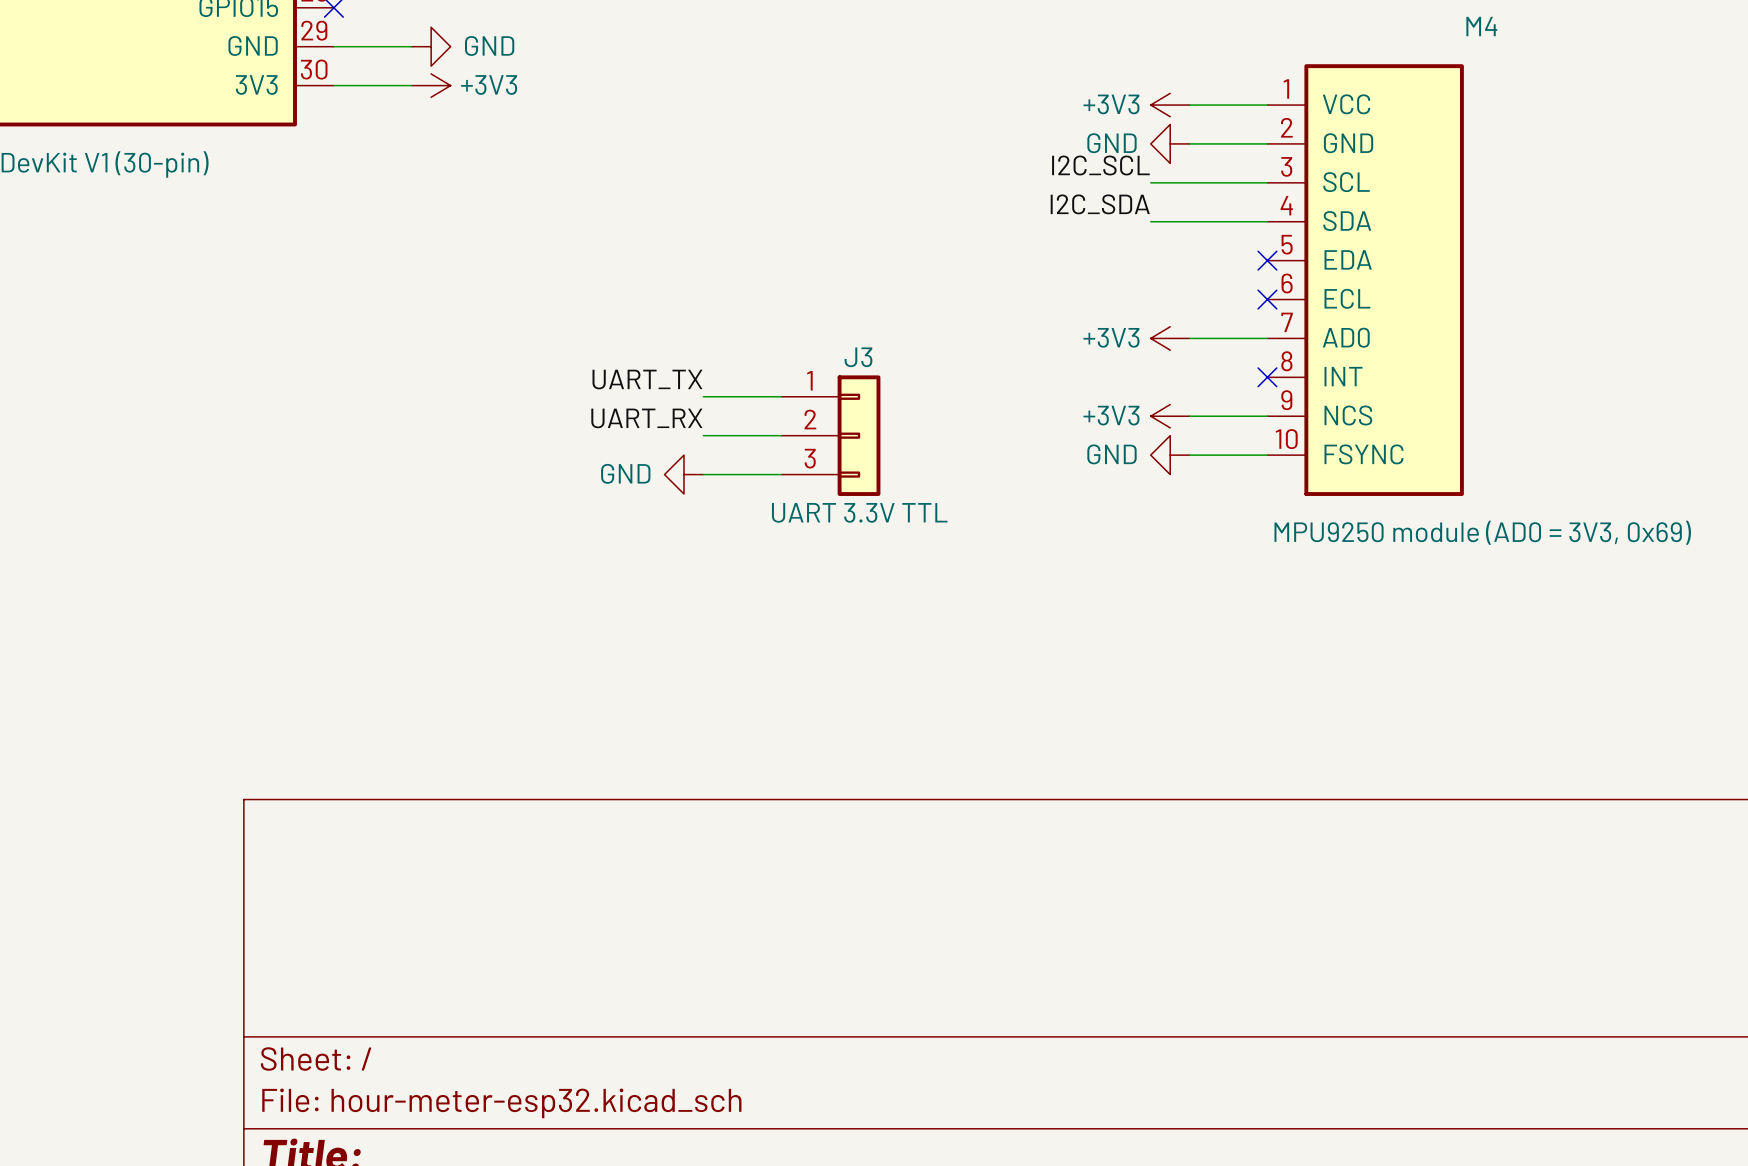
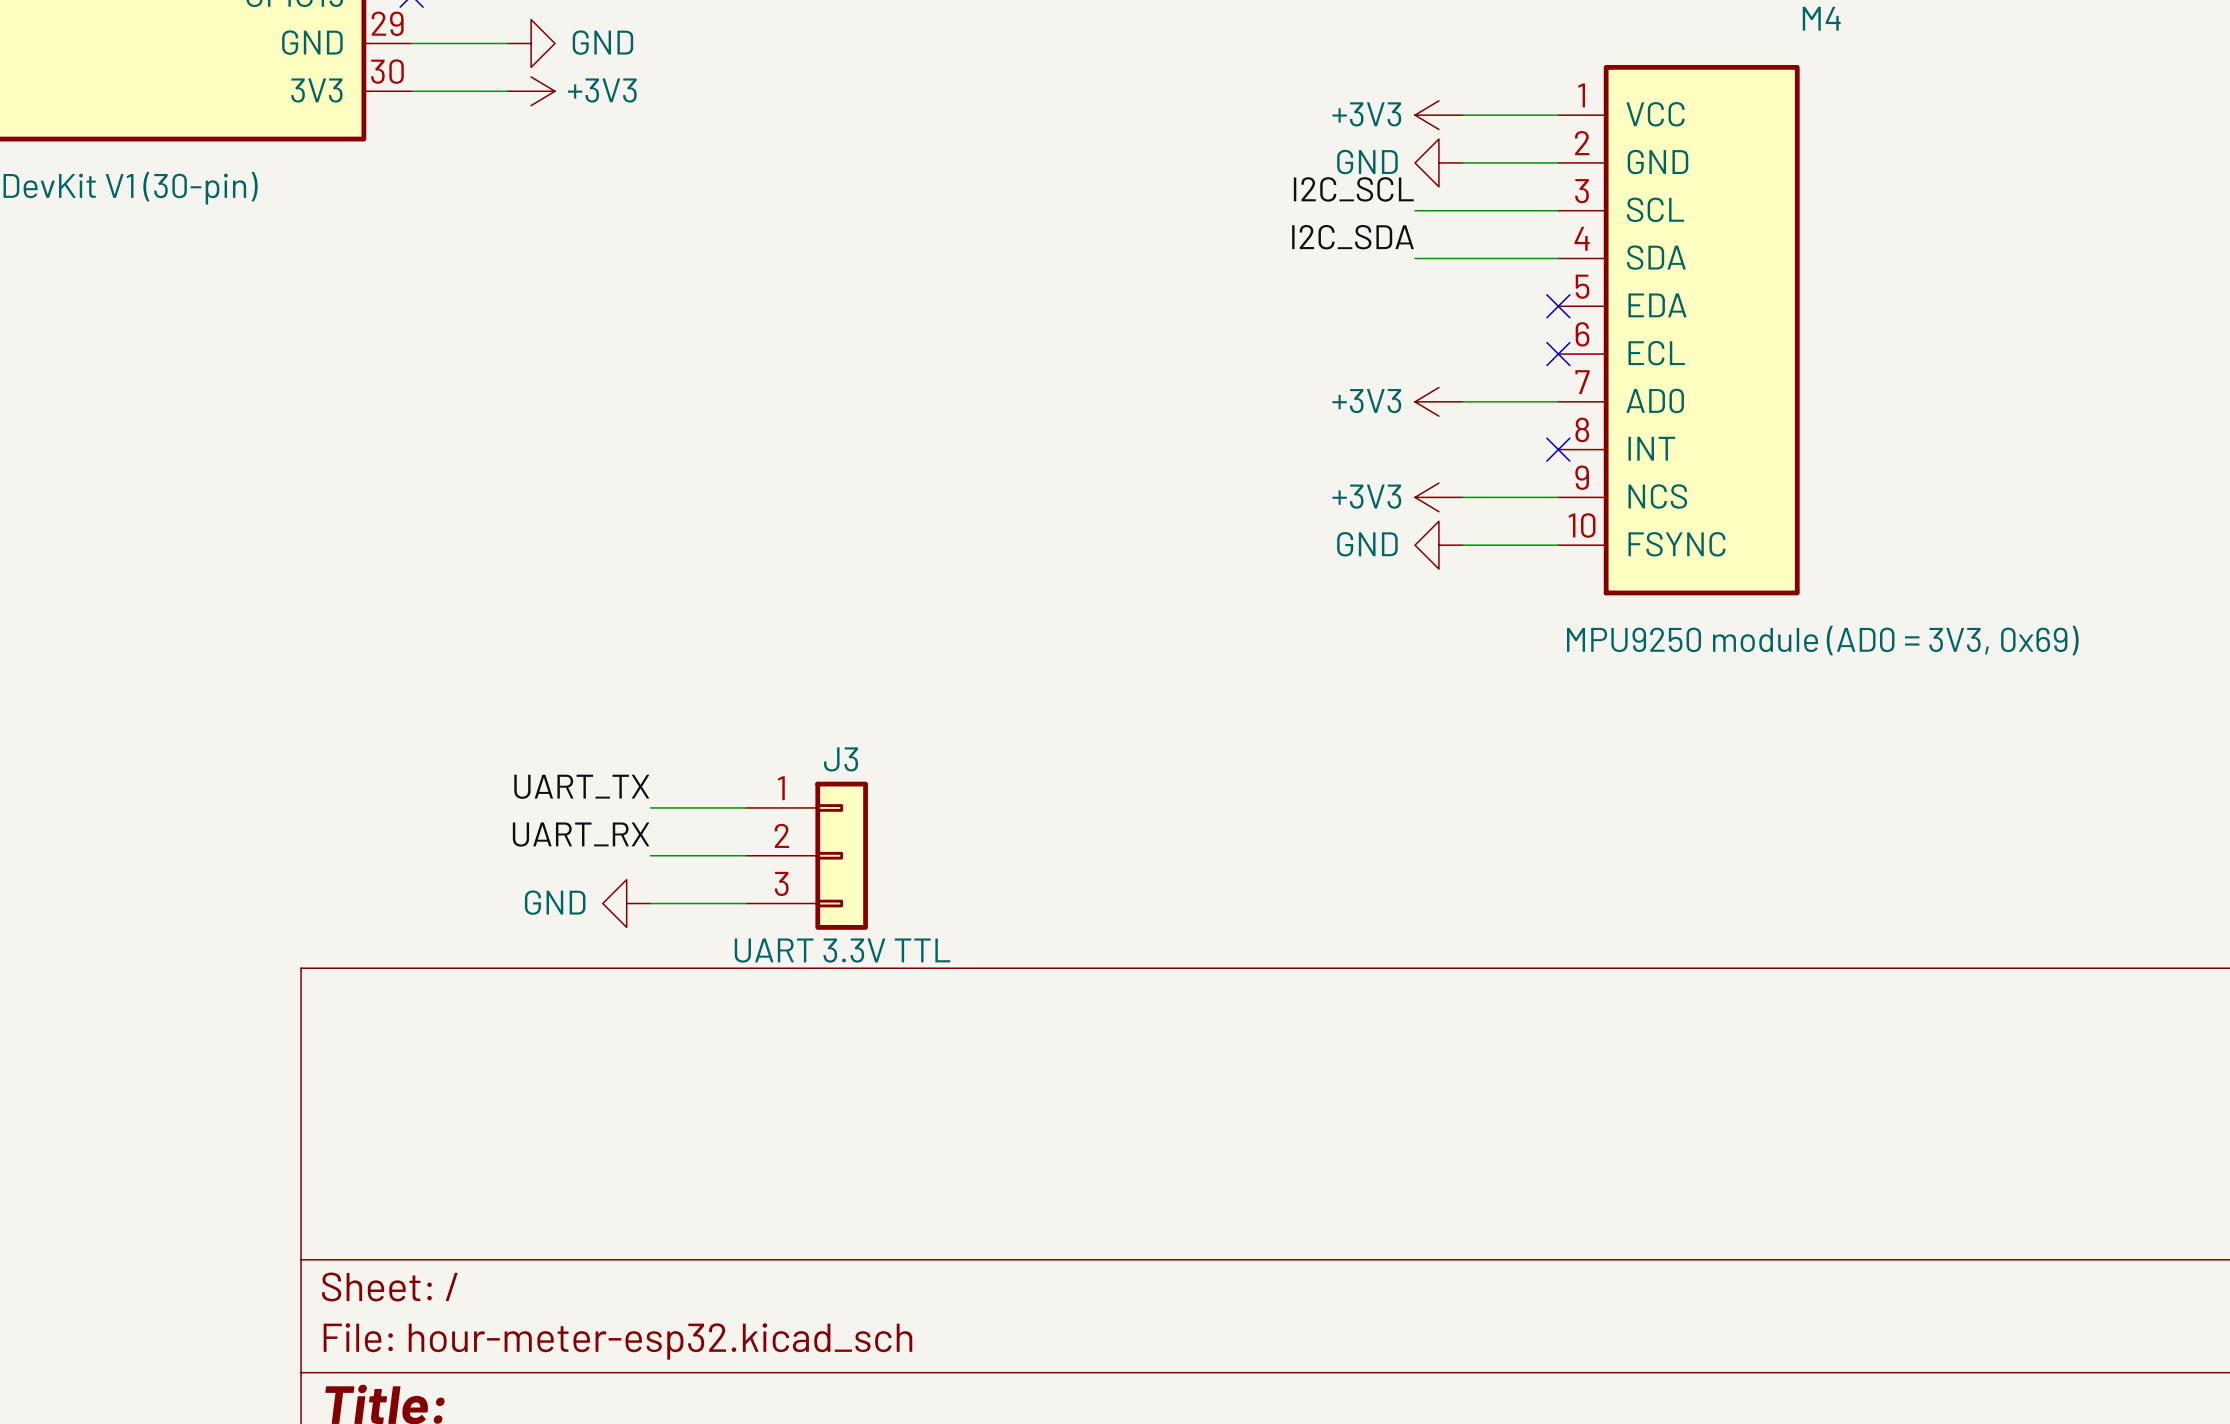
label position: UART_TX (647, 379) -> UART_TX (581, 786)
wire: (703, 396) (781, 396) -> (650, 807) (746, 807)
label position: UART_RX (646, 418) -> UART_RX (581, 834)
wire: (703, 435) (781, 435) -> (650, 855) (746, 855)
J3 position: (830, 435) -> (807, 855)
power symbol position: GND (683, 474) -> GND (626, 903)
wire: (703, 474) (781, 474) -> (650, 903) (746, 903)

